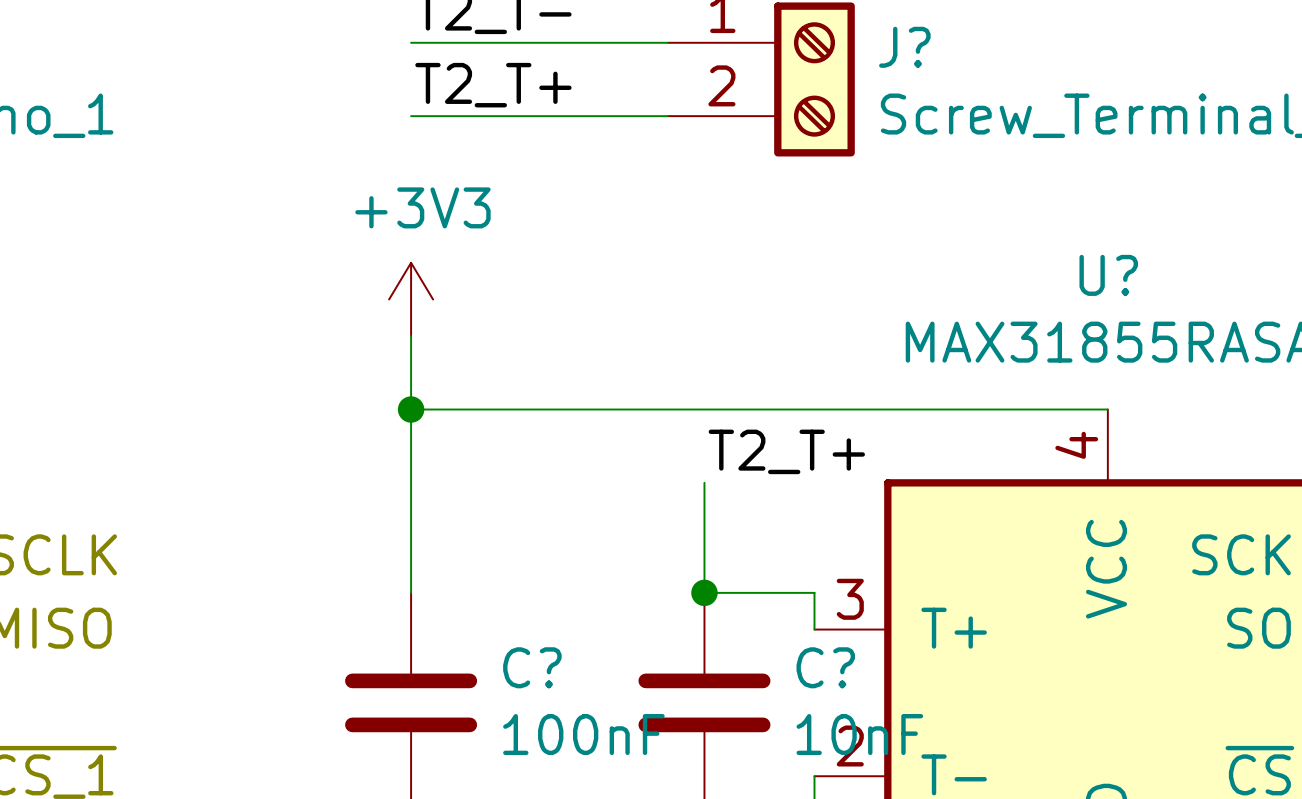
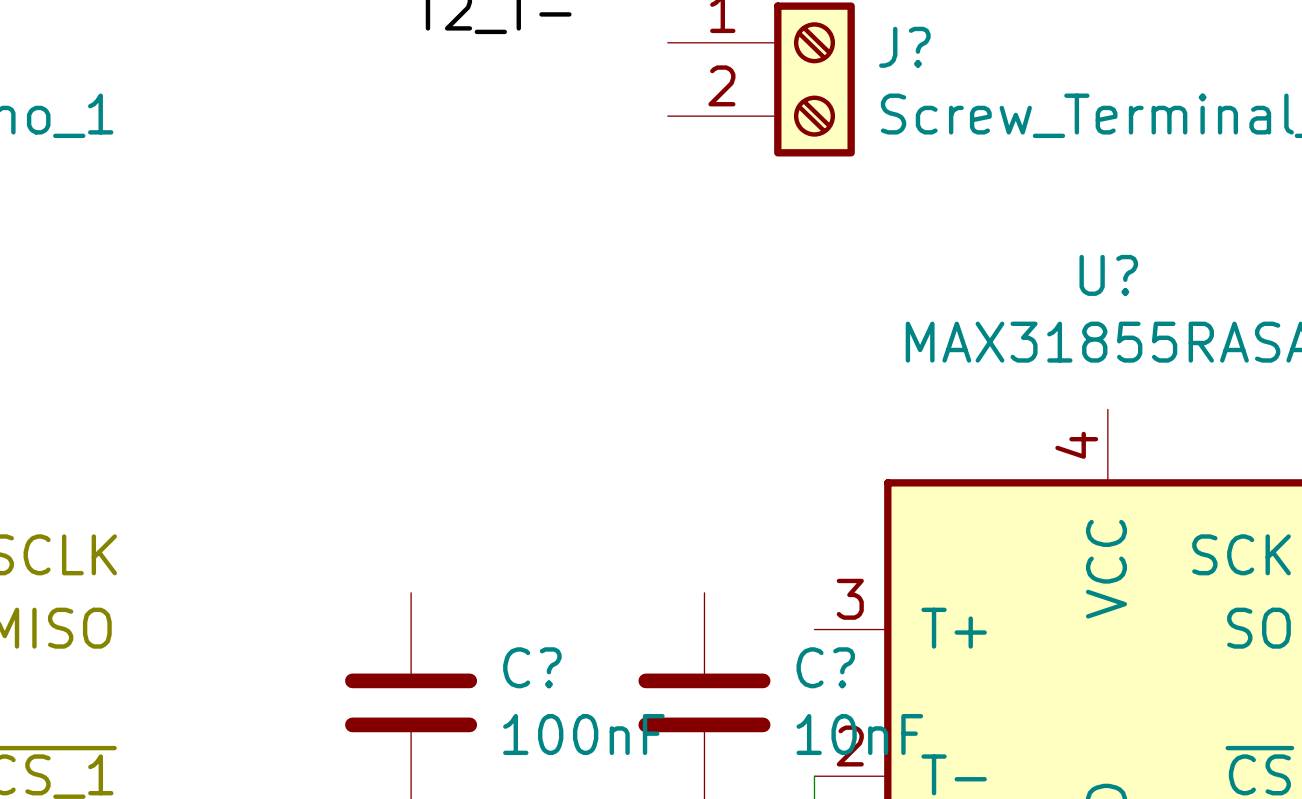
wire: (411, 42) (667, 42) -> none
label: T2_T+ (493, 85) -> none
wire: (411, 116) (667, 116) -> none
power symbol: +3V3 (411, 299) -> none
wire: (411, 336) (411, 592) -> none
wire: (411, 409) (1107, 409) -> none
junction: (411, 409) -> none
label: T2_T+ (786, 451) -> none
wire: (704, 482) (704, 592) (814, 592) (814, 629) -> none
junction: (704, 592) -> none

